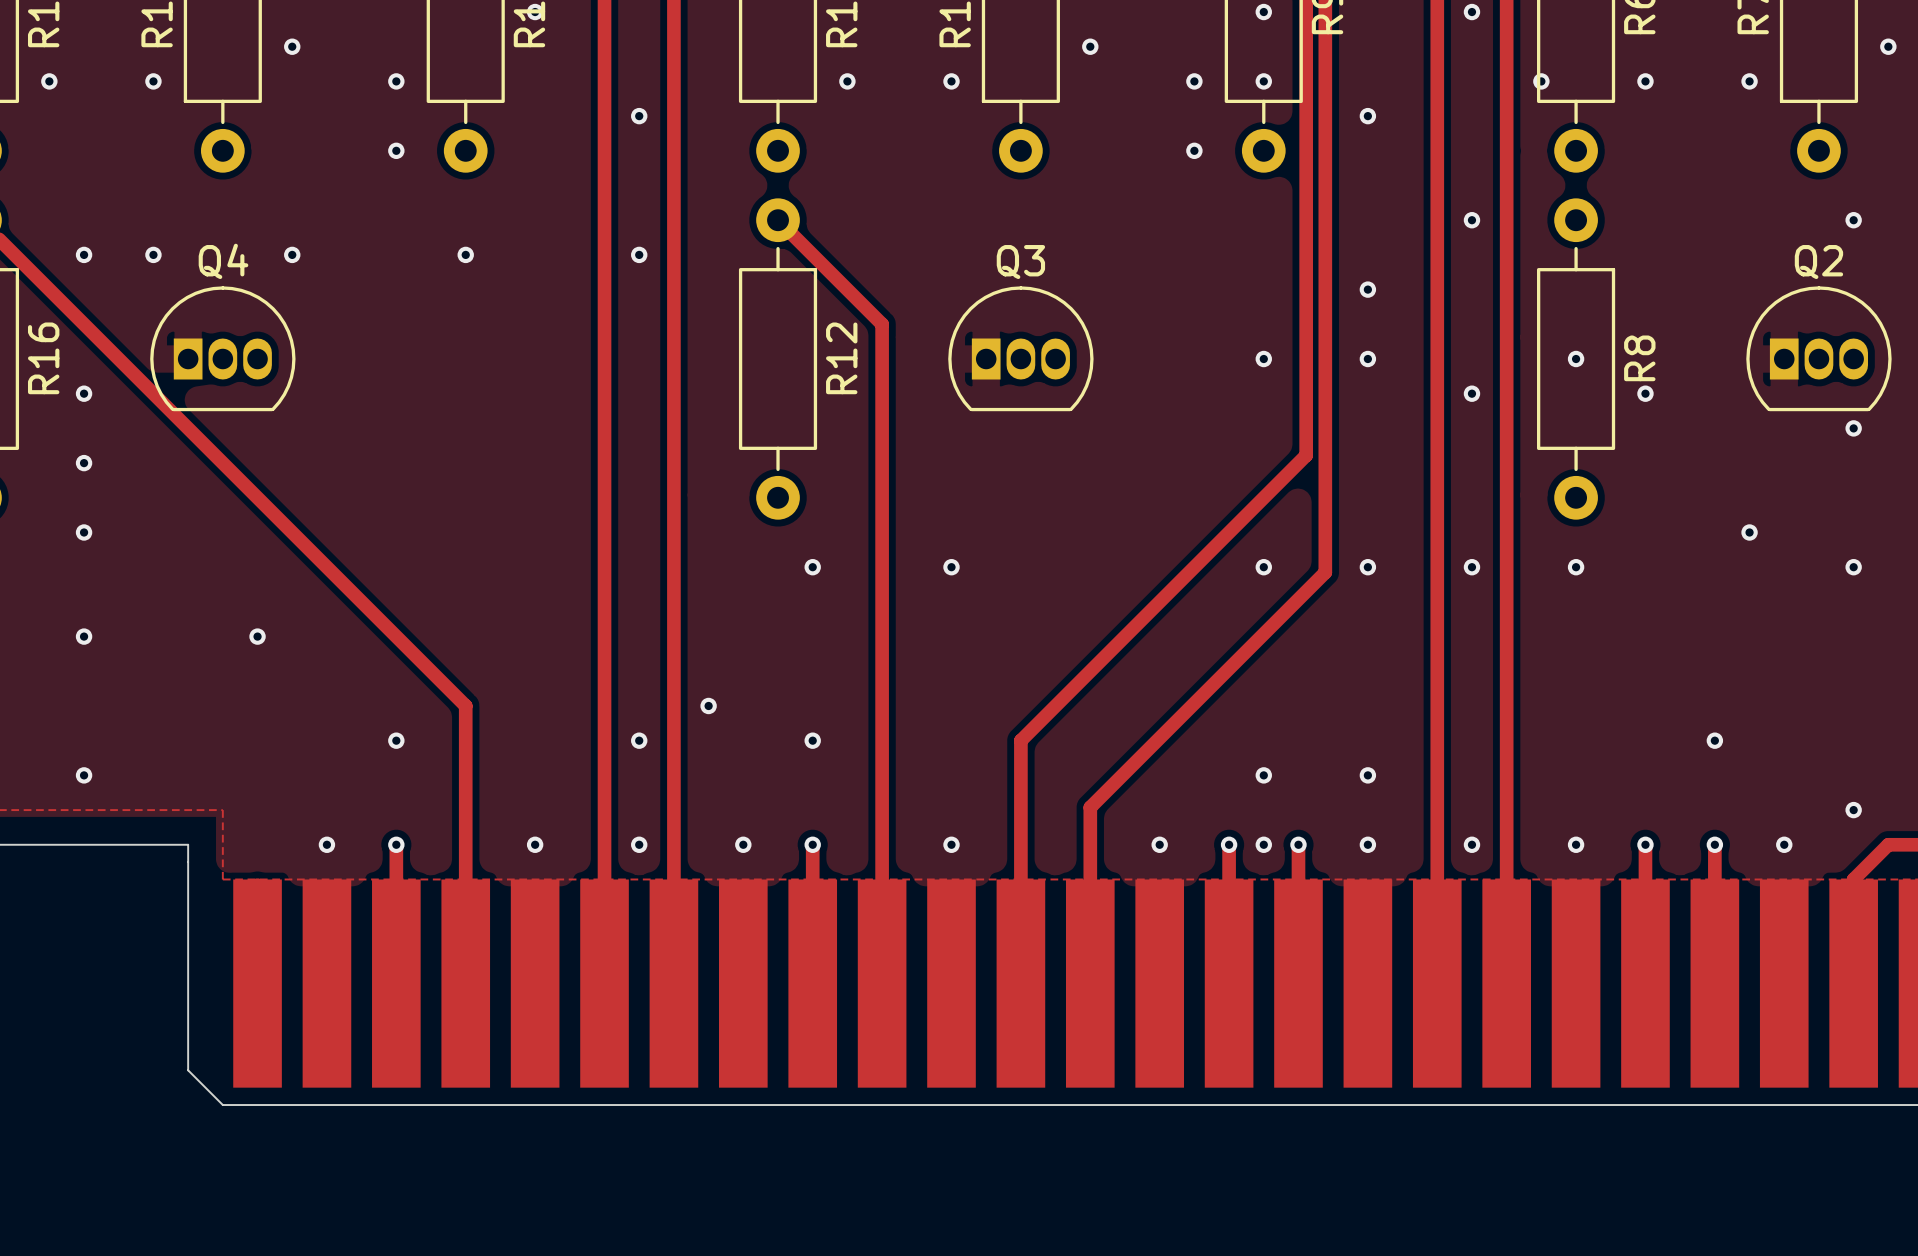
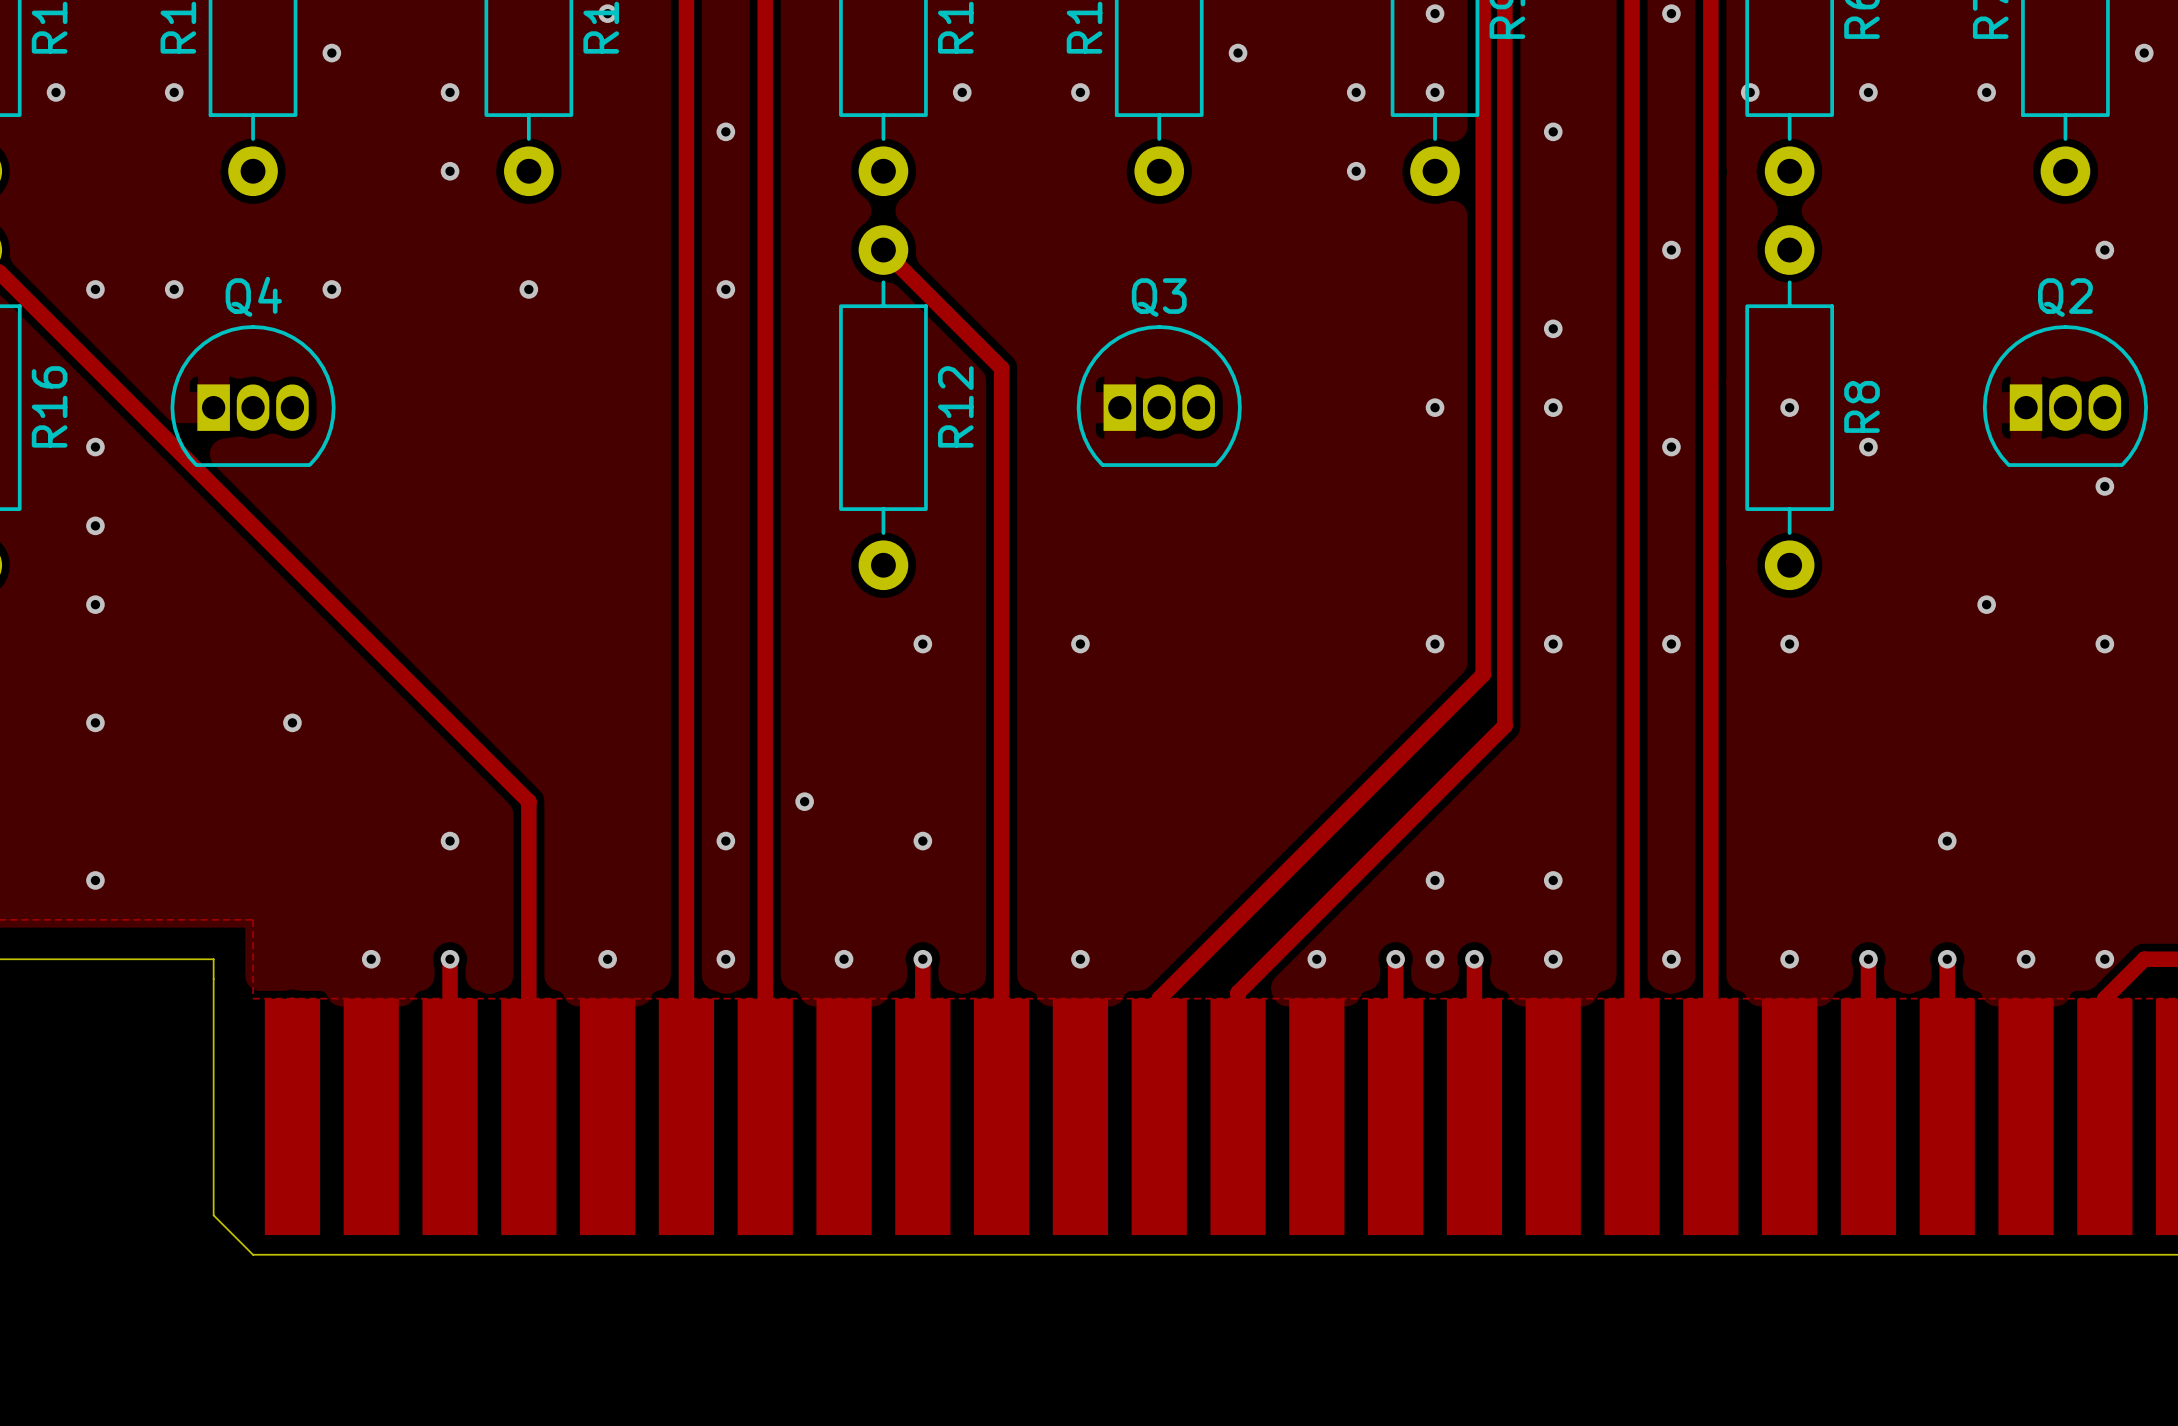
track: (1306, 455) (1020, 740) (1020, 879) -> (1483, 517) (1483, 674) (1159, 998)
track: (1325, 572) (1090, 807) (1090, 874) -> (1504, 650) (1504, 725) (1238, 992)
via position: (1853, 810) -> (2104, 959)

